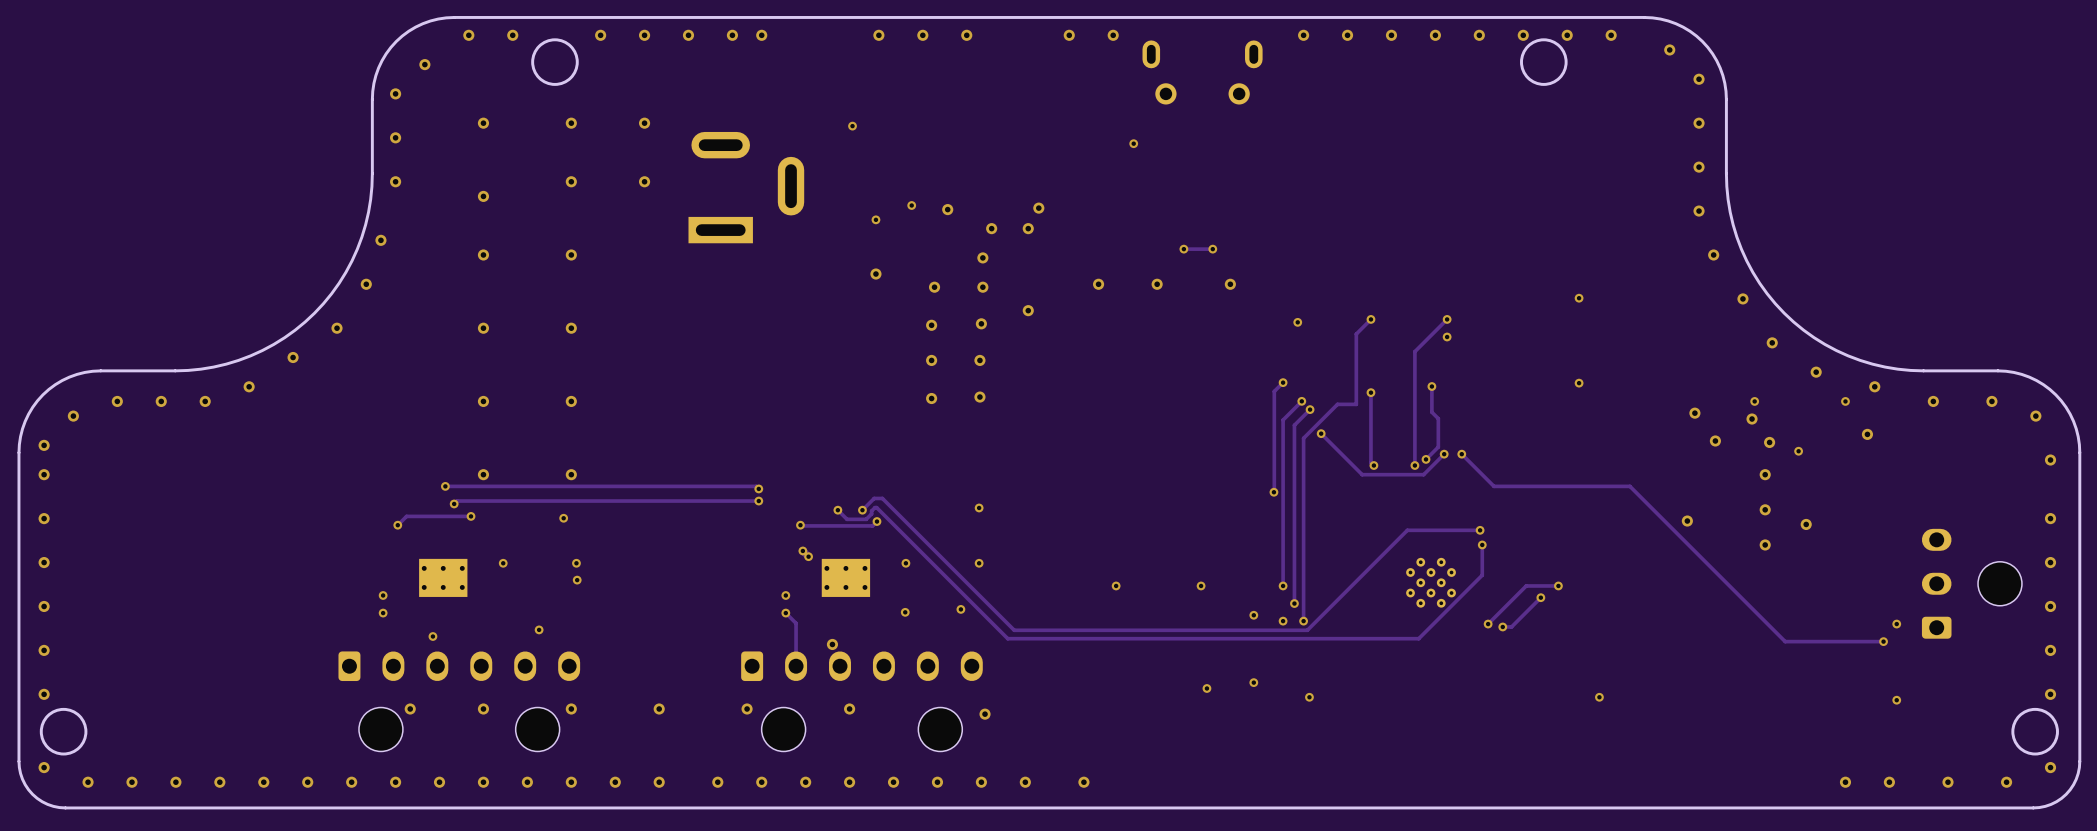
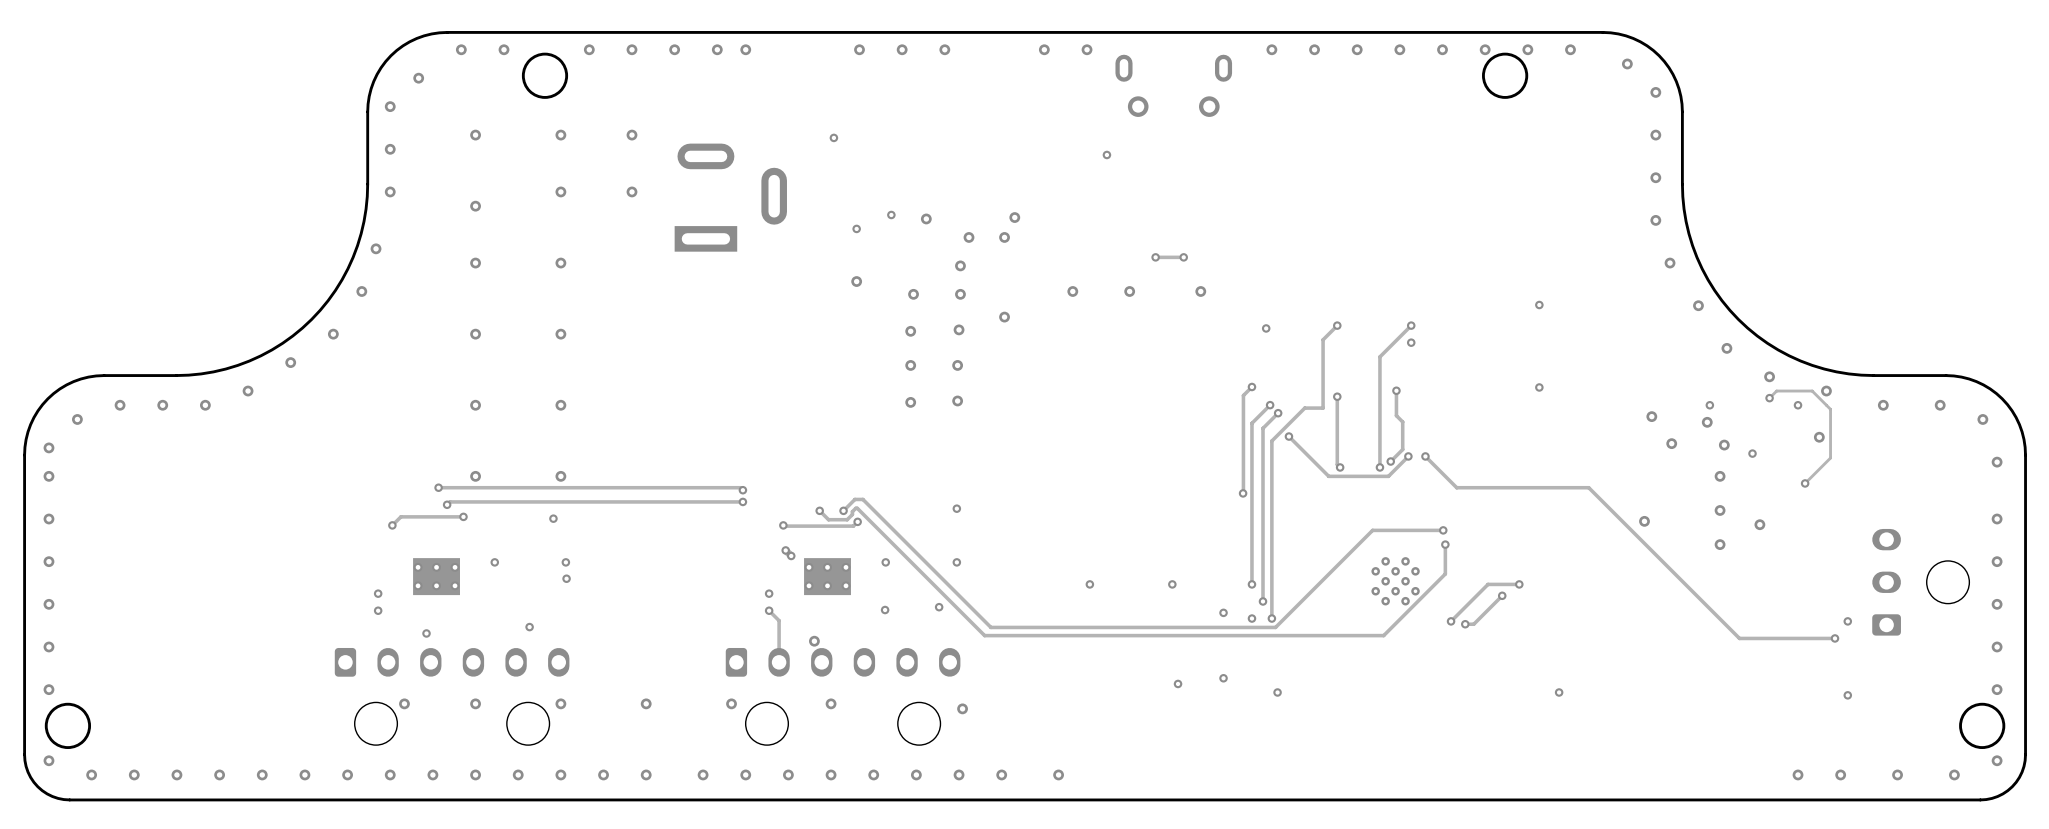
track: none -> (1769, 398) (1776, 391) (1812, 391) (1830, 409) (1830, 458) (1805, 483)
via: none -> (1769, 398)
via: none -> (1805, 483)

